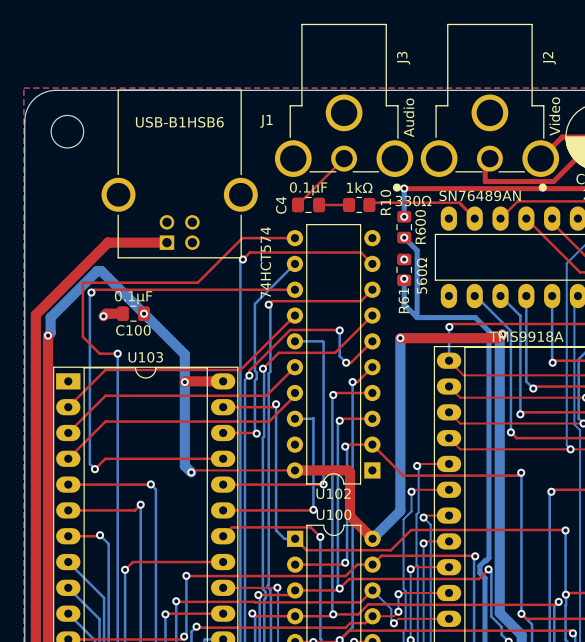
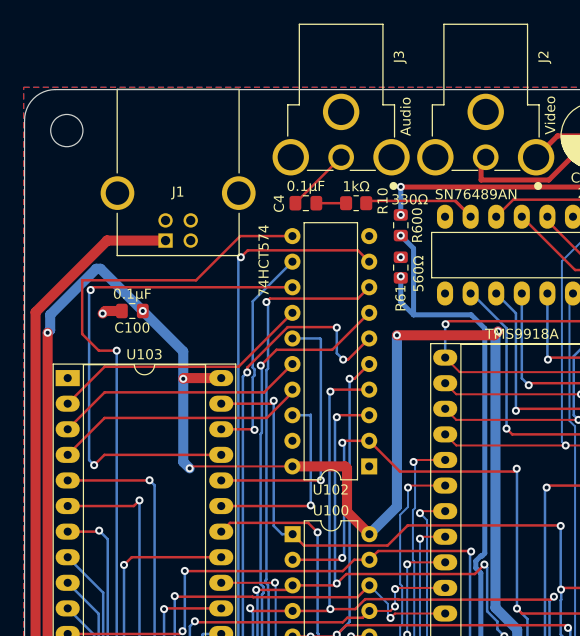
J1 name position: J1 (266, 121) -> J1 (177, 192)
J1 value: USB-B1HSB6 (179, 122) -> none

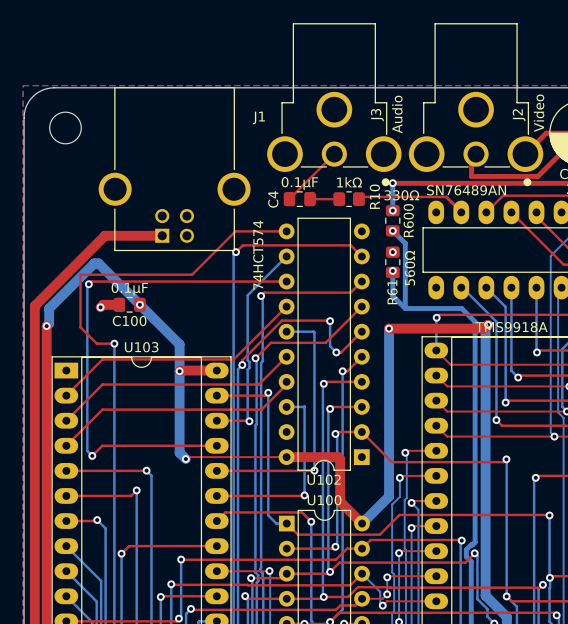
J3 name position: J3 (400, 57) -> J3 (377, 115)
J2 name position: J2 (544, 57) -> J2 (519, 115)
J1 name position: J1 (177, 192) -> J1 (258, 117)

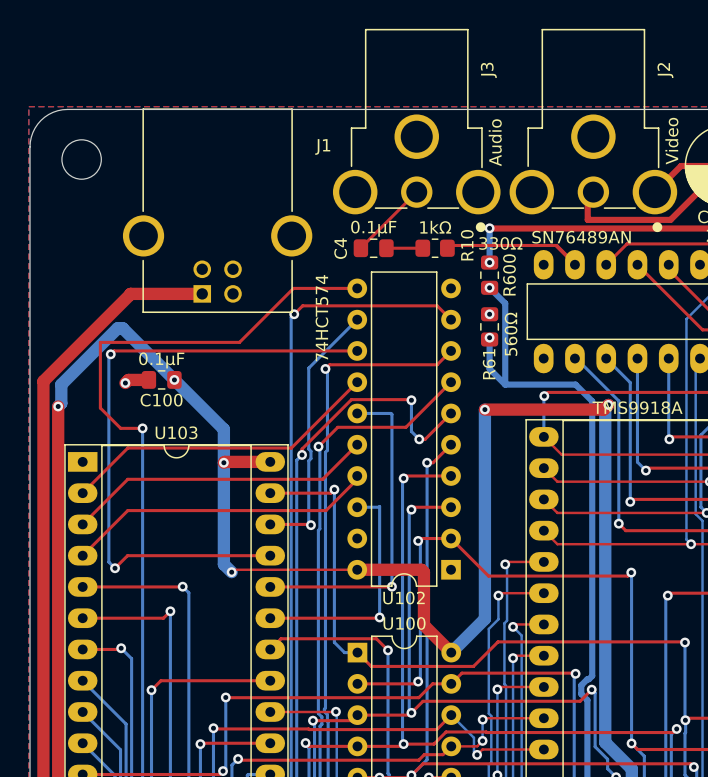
J3 name position: J3 (377, 115) -> J3 (488, 70)
J2 name position: J2 (519, 115) -> J2 (665, 70)

